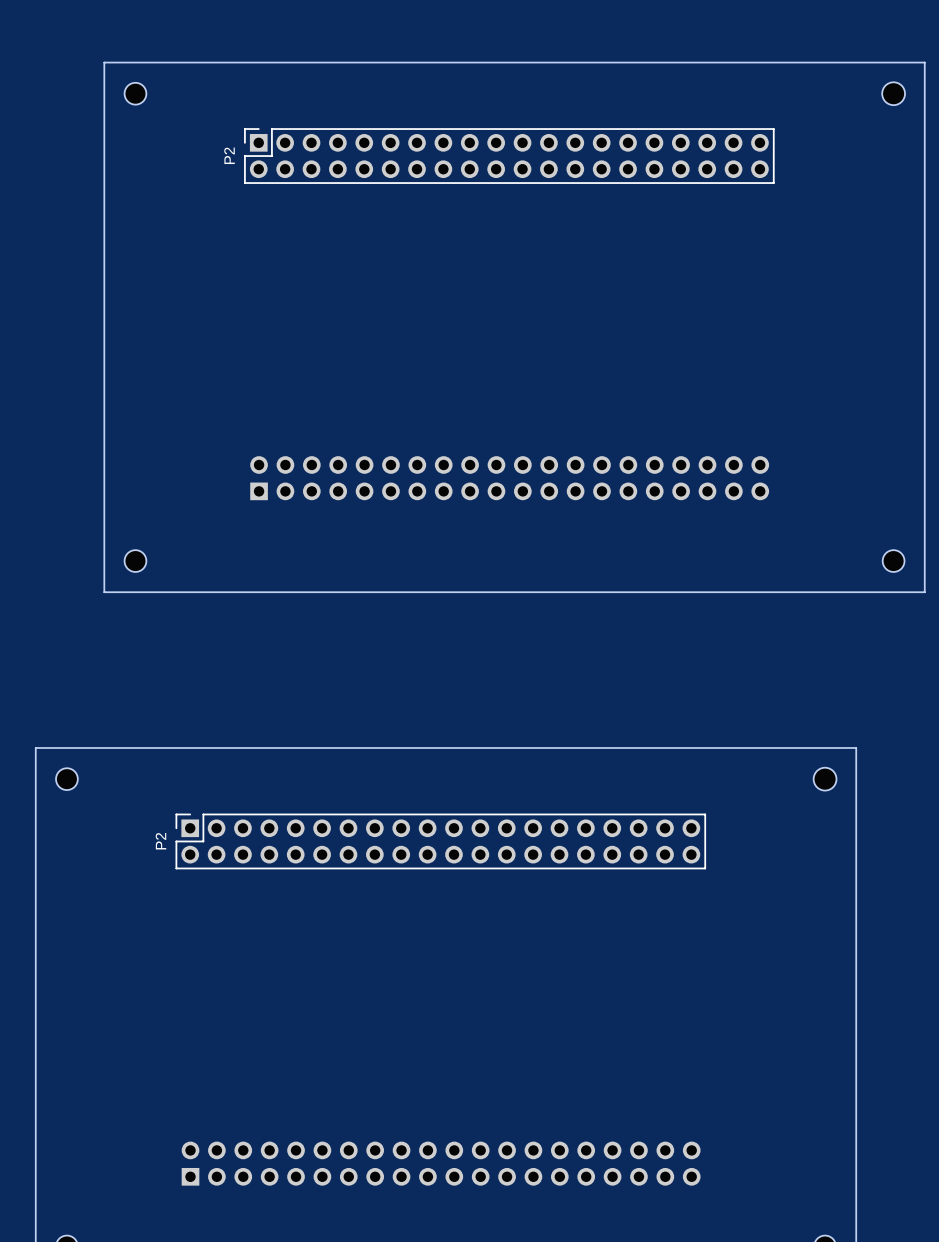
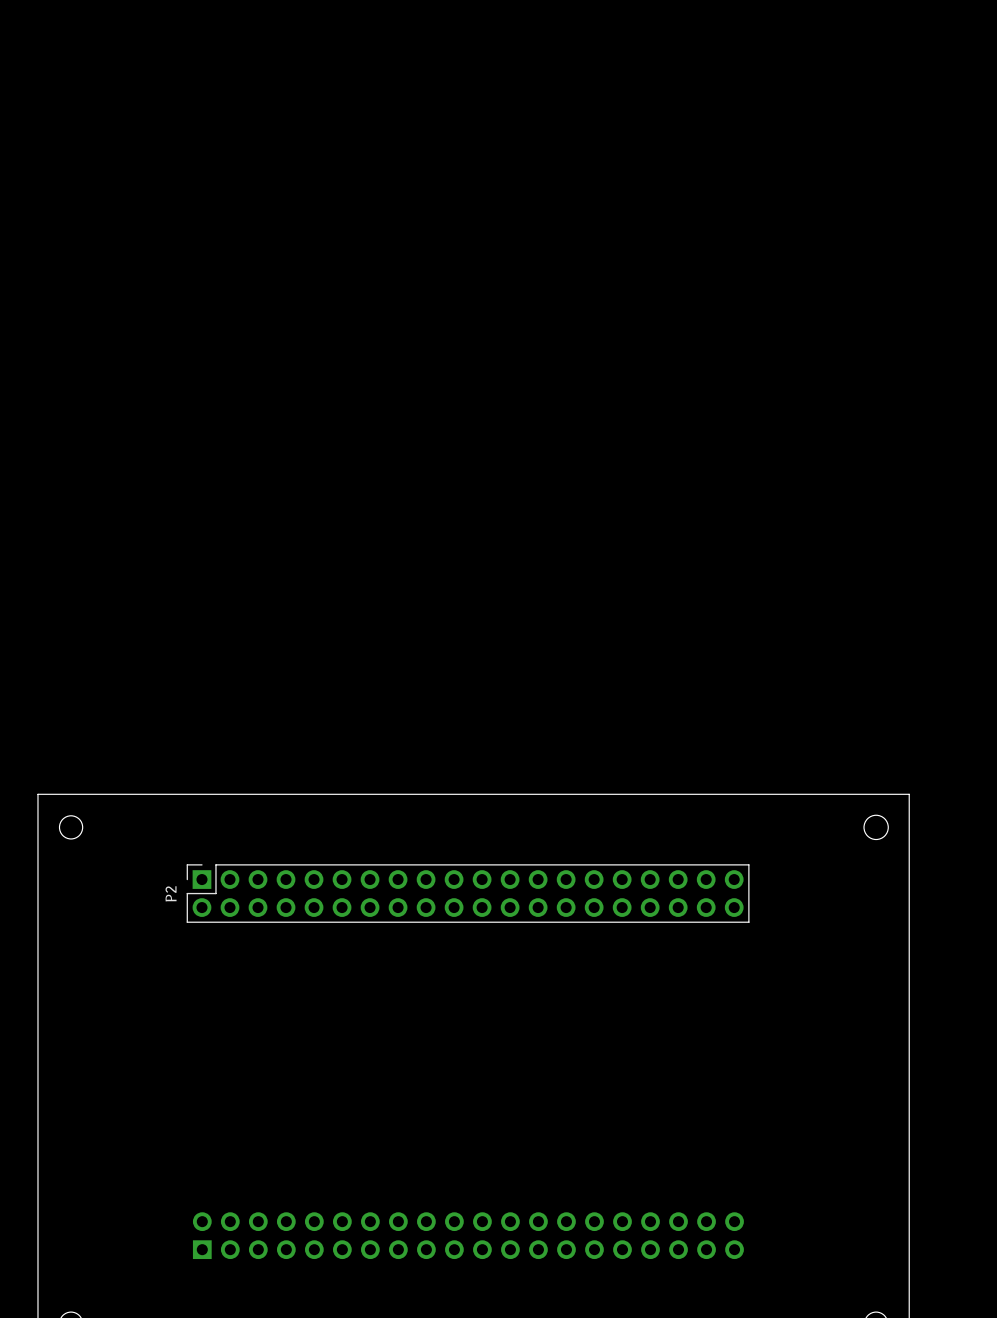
board edge: (104, 62) (924, 62) (924, 592) (104, 592) (104, 62) -> none
part: (135, 93) -> none
part: (893, 93) -> none
P2: (509, 156) -> none
part: (509, 478) -> none
part: (135, 561) -> none
part: (893, 561) -> none

